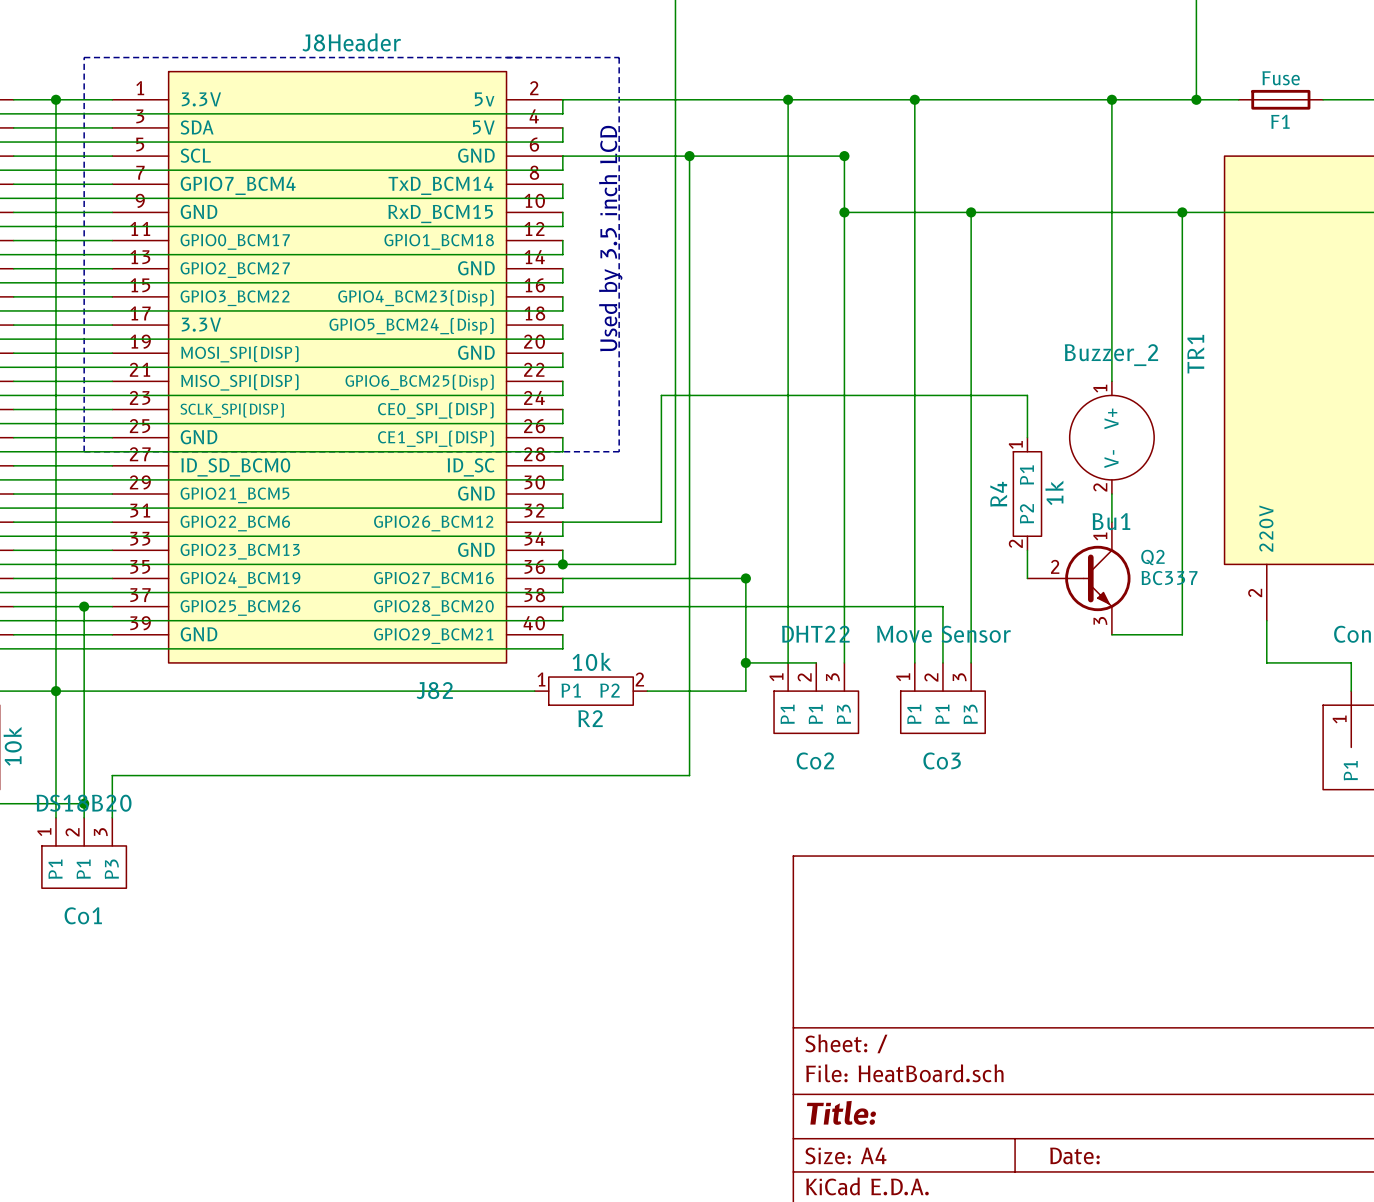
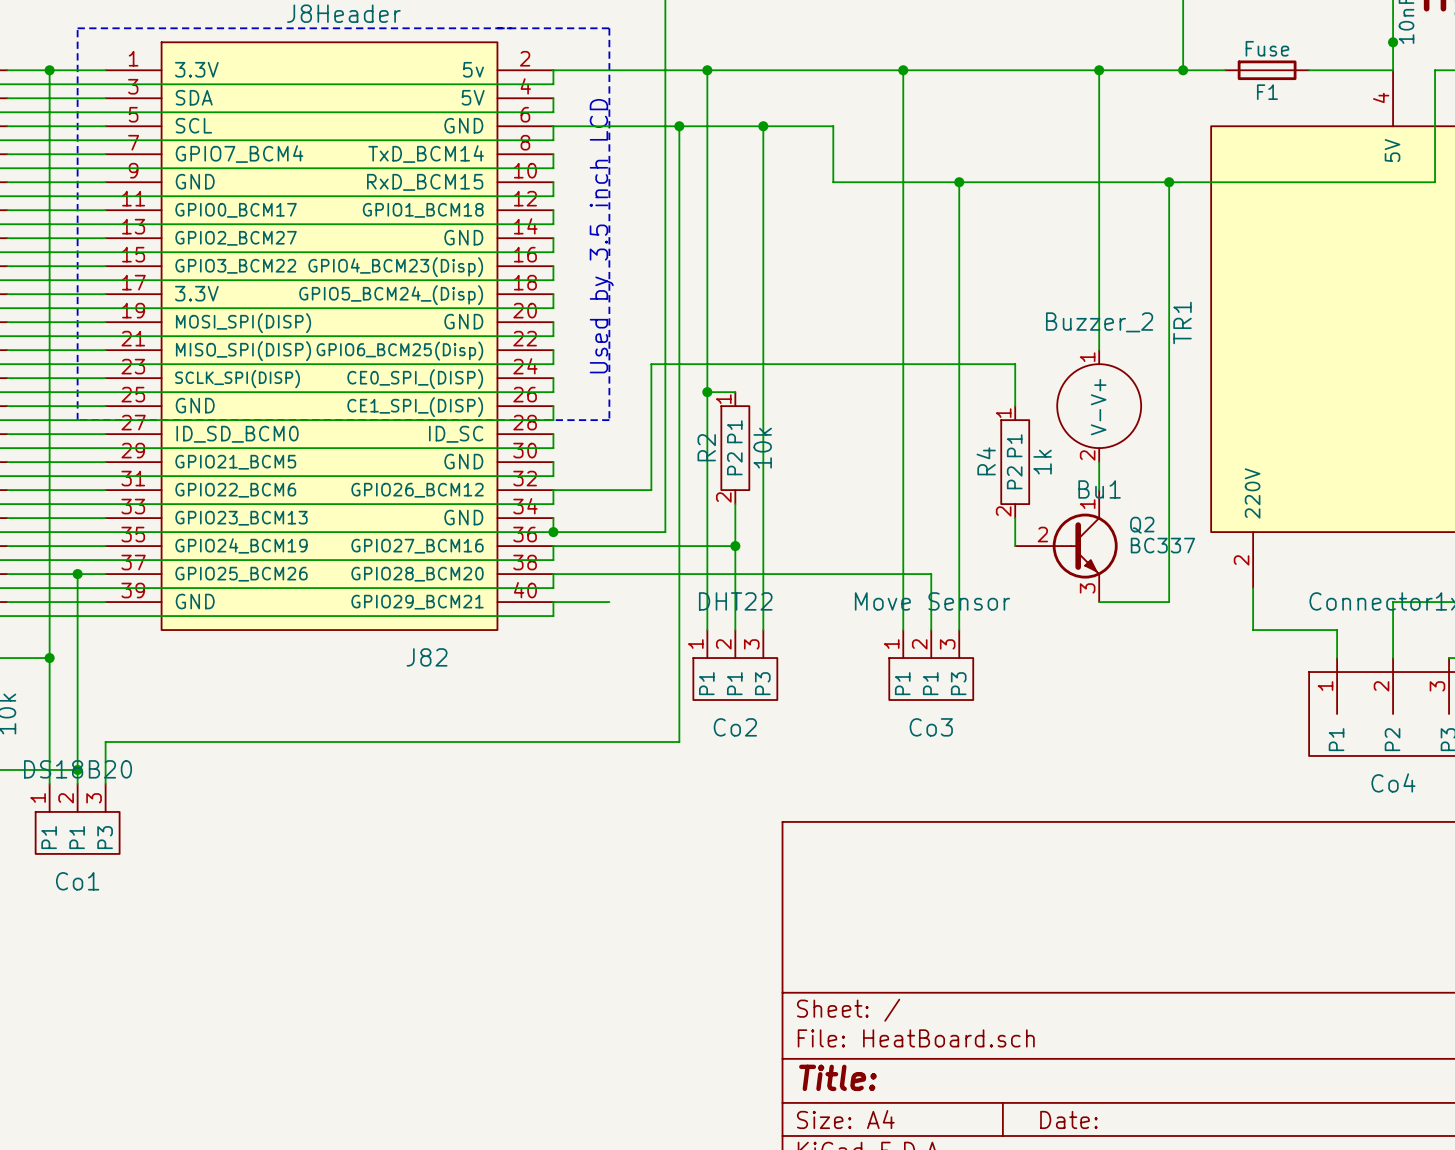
junction: none -> (707, 70)
wire: (788, 99) (788, 662) -> (707, 70) (707, 630)
junction: (788, 99) -> none
wire: none -> (763, 126) (763, 630)
junction: none -> (763, 126)
junction: (844, 156) -> none
wire: (844, 212) (844, 662) -> none
junction: (844, 212) -> none
wire: none -> (707, 392) (735, 392)
junction: none -> (707, 392)
wire: none -> (735, 504) (735, 546)
wire: none -> (553, 602) (609, 602)
junction: (745, 662) -> none
wire: (816, 662) (745, 662) (745, 691) (647, 691) -> none
wire: (56, 691) (534, 691) -> none
R2 rotation: 0° (591, 691) -> 90° clockwise (735, 448)
R2 position: (591, 691) -> (735, 448)
Co2 position: (816, 698) -> (735, 665)

